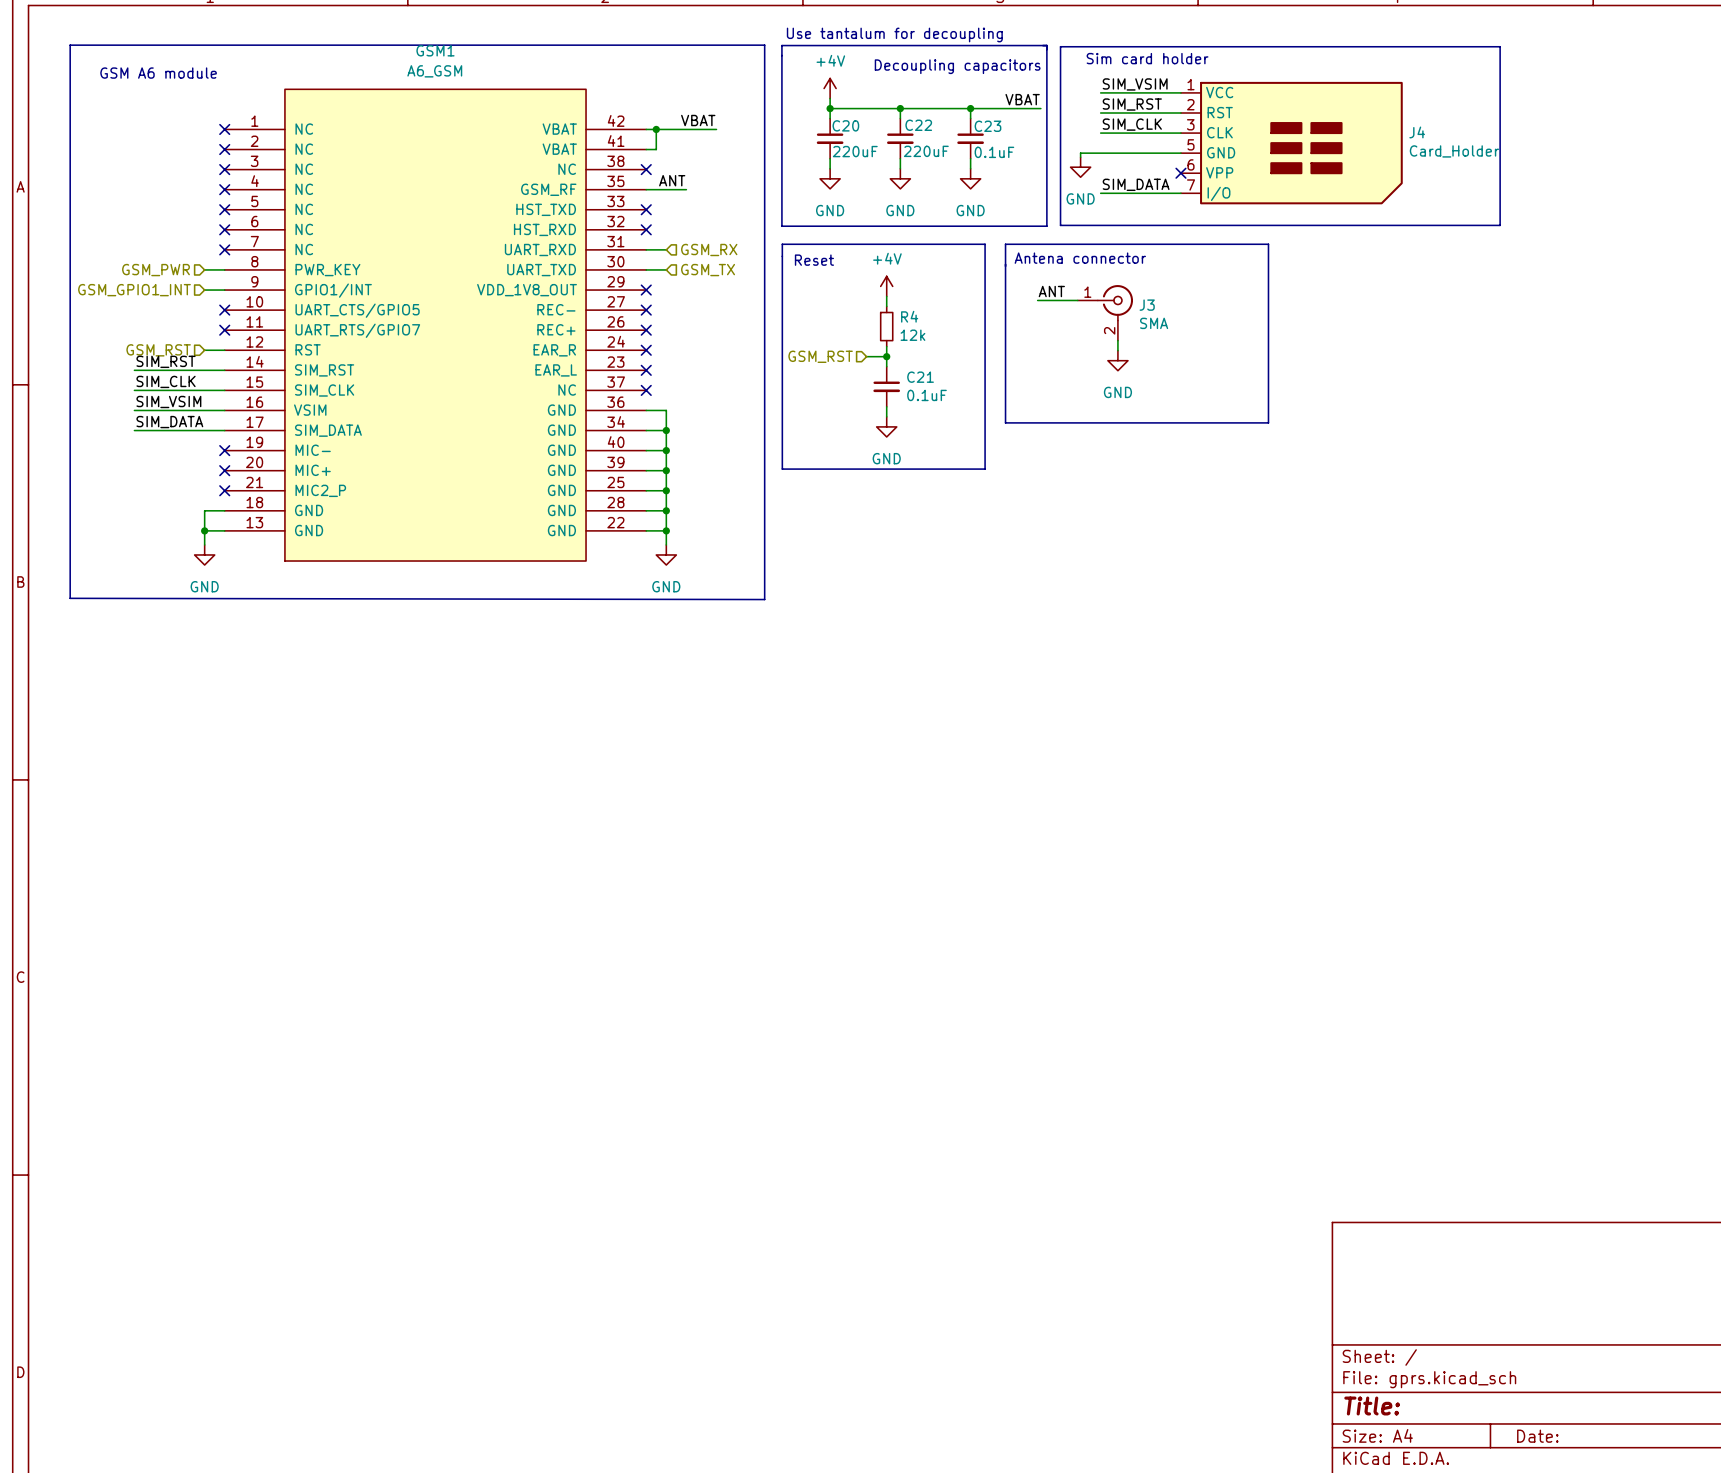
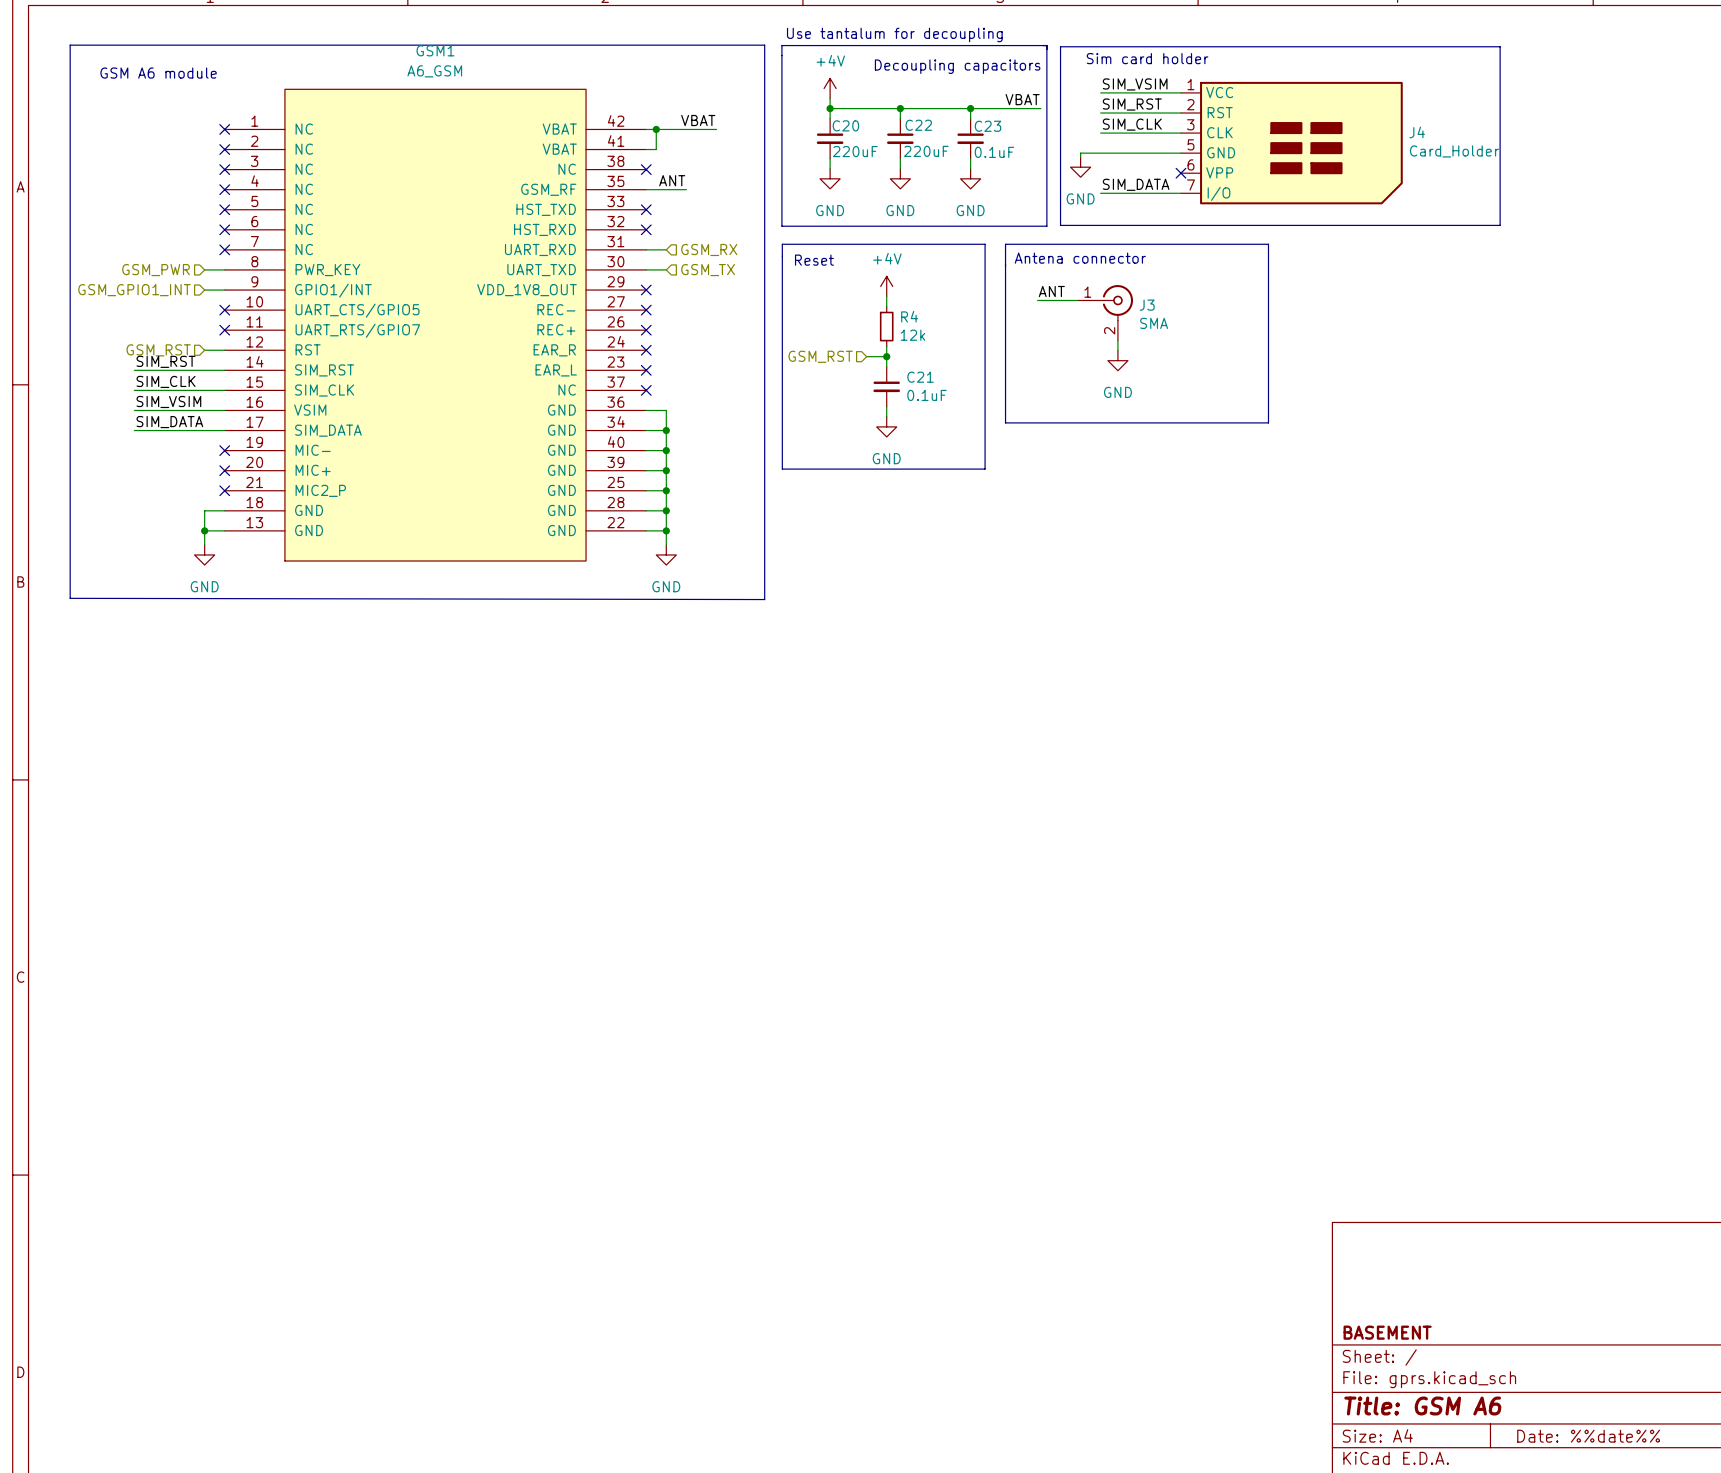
title block: none -> BASEMENT (1387, 1332)
title block: Title: (1372, 1406) -> Title: GSM A6 (1422, 1406)
title block: Date: (1537, 1436) -> Date: %%date%% (1588, 1436)

